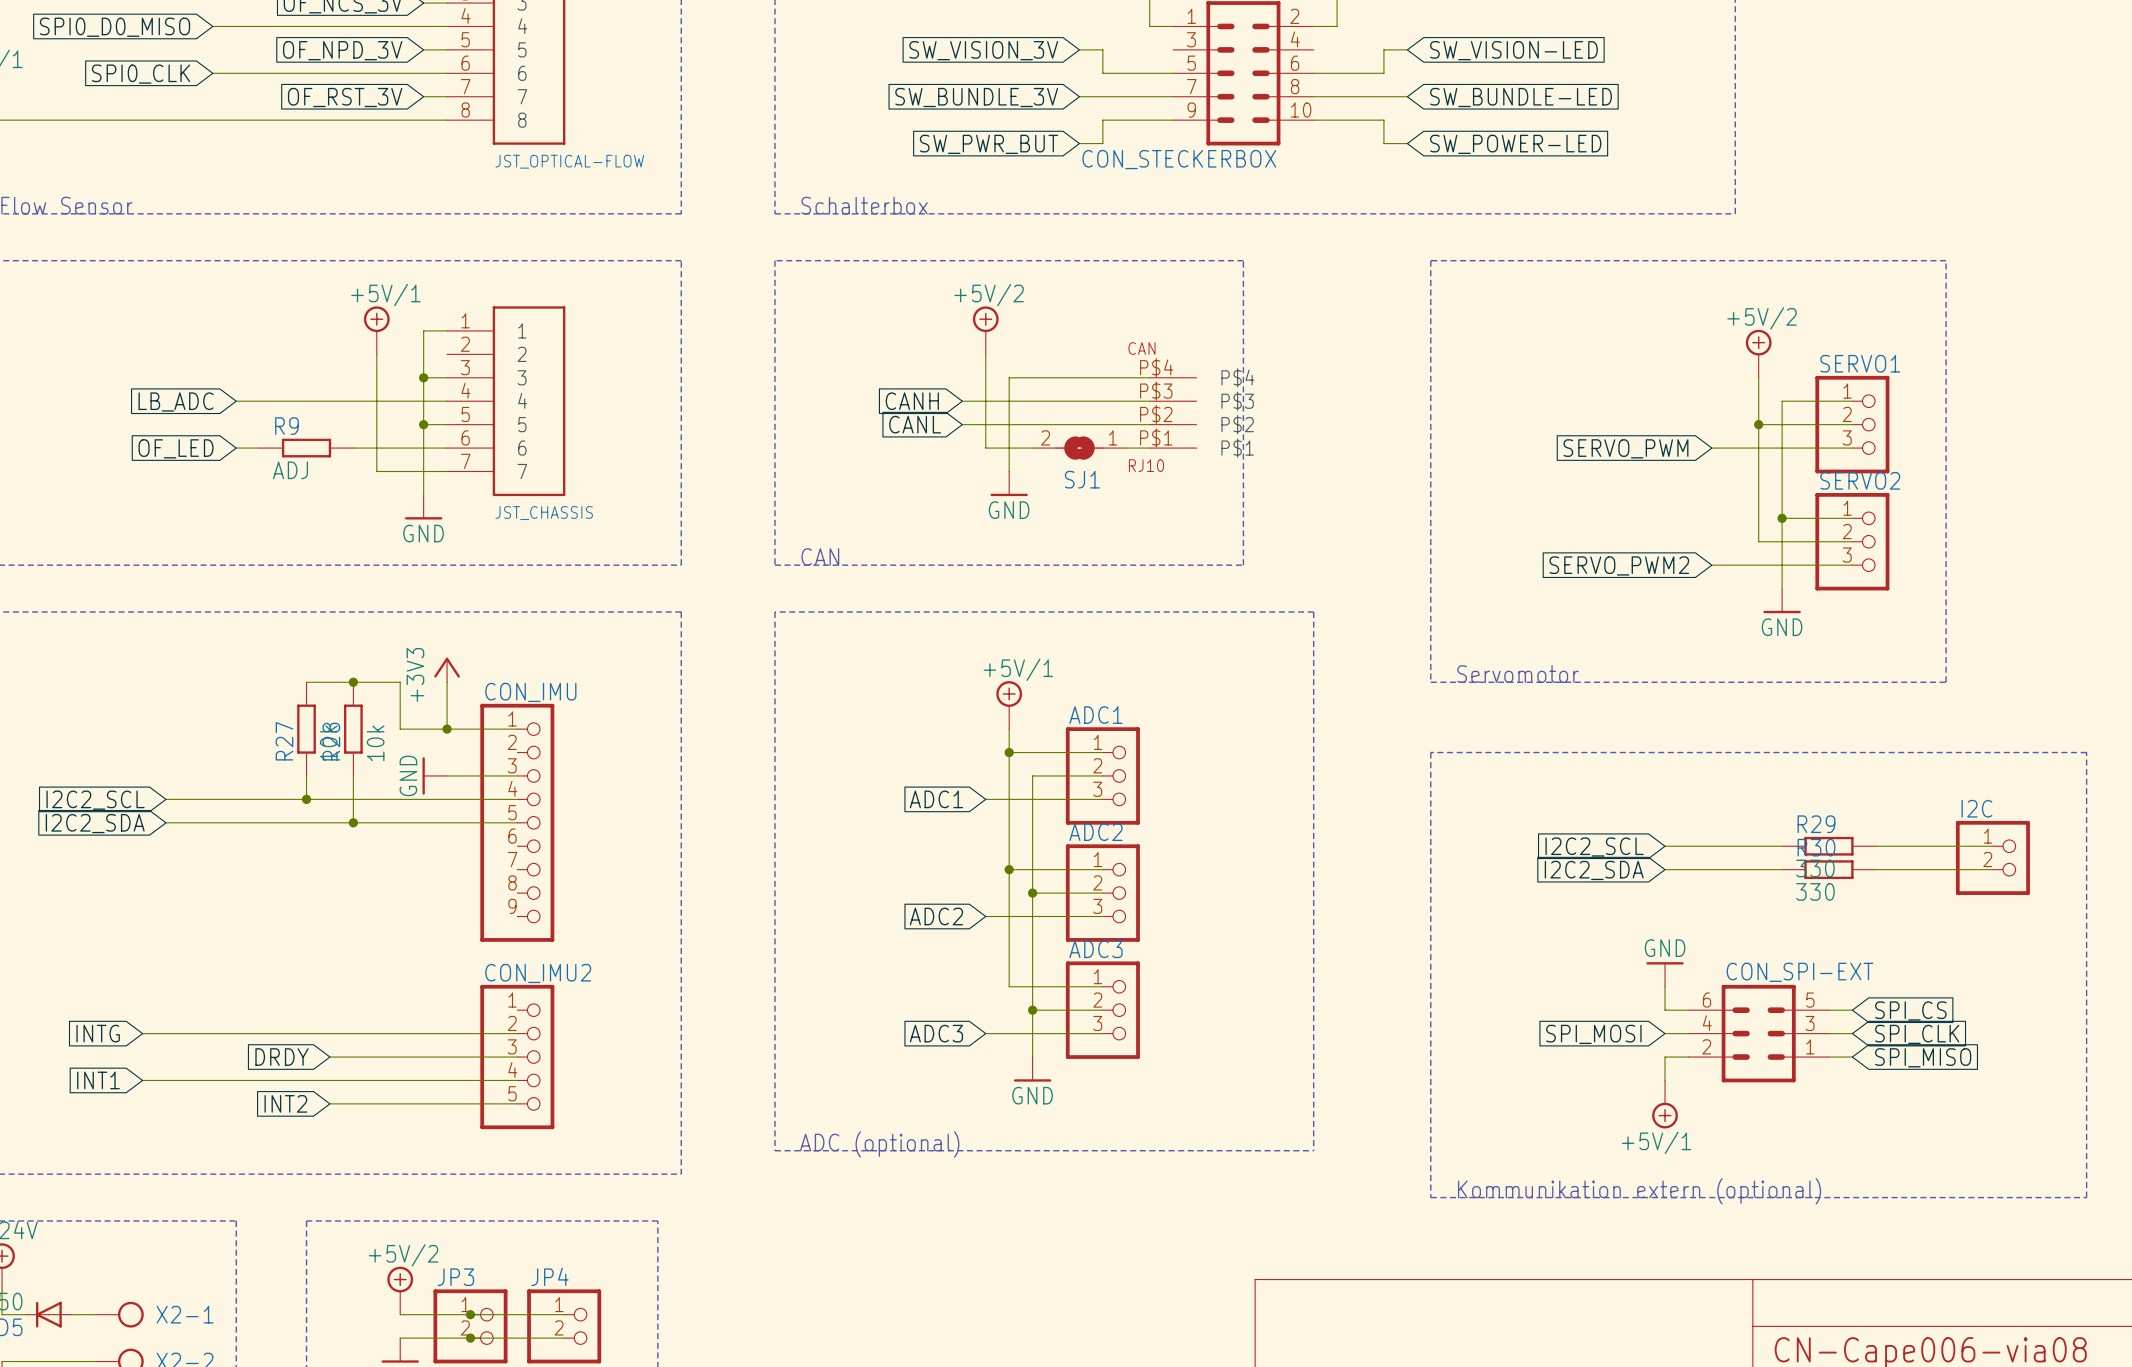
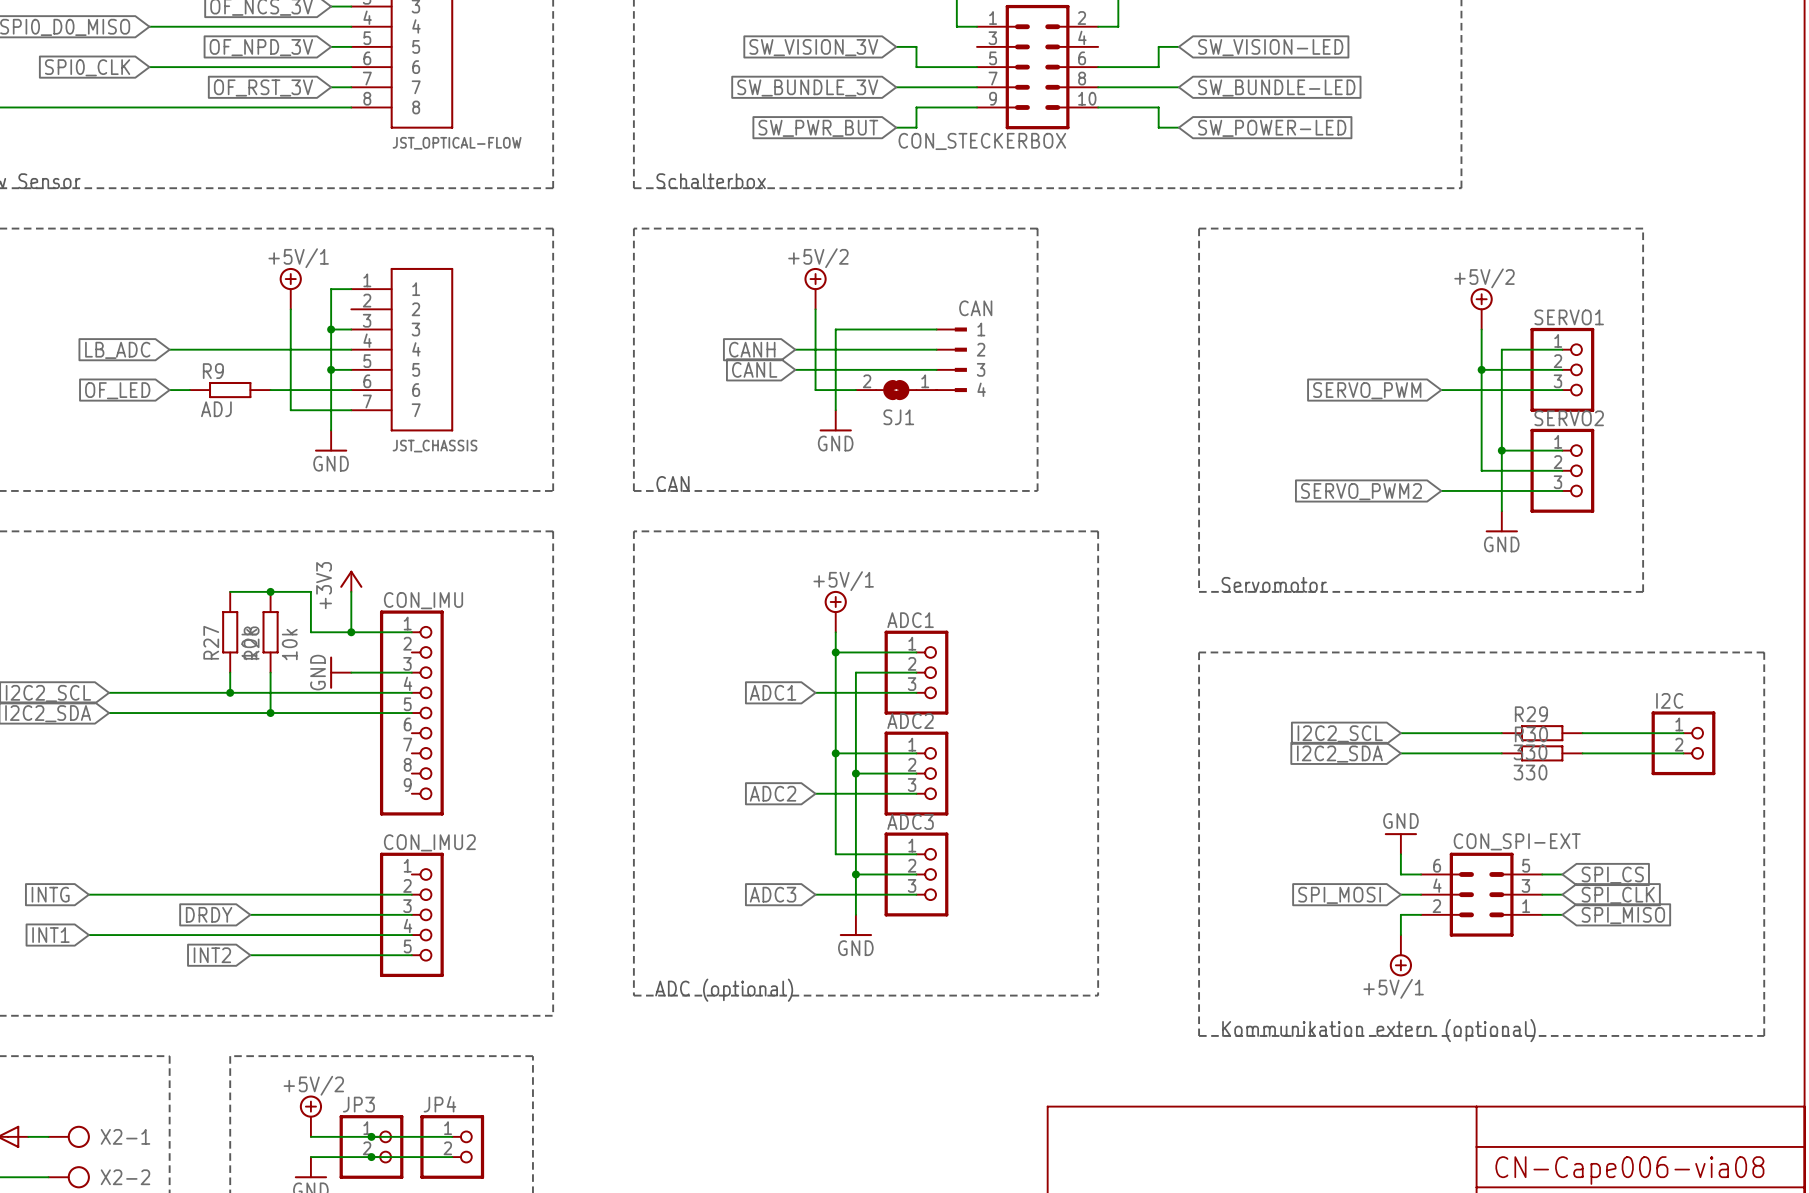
CAN: none -> (951, 359)
CAN: RJ10 (1173, 412) -> none

